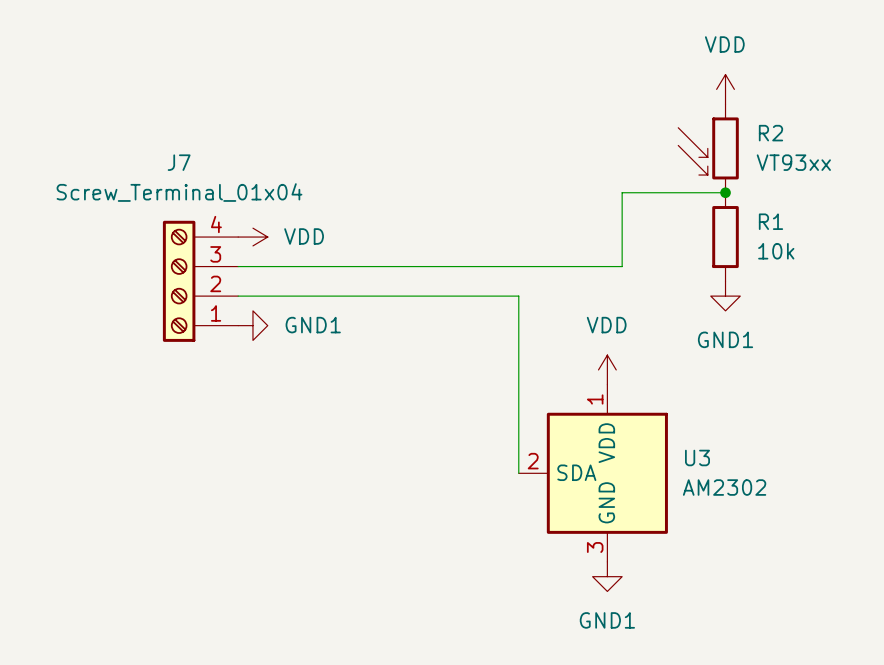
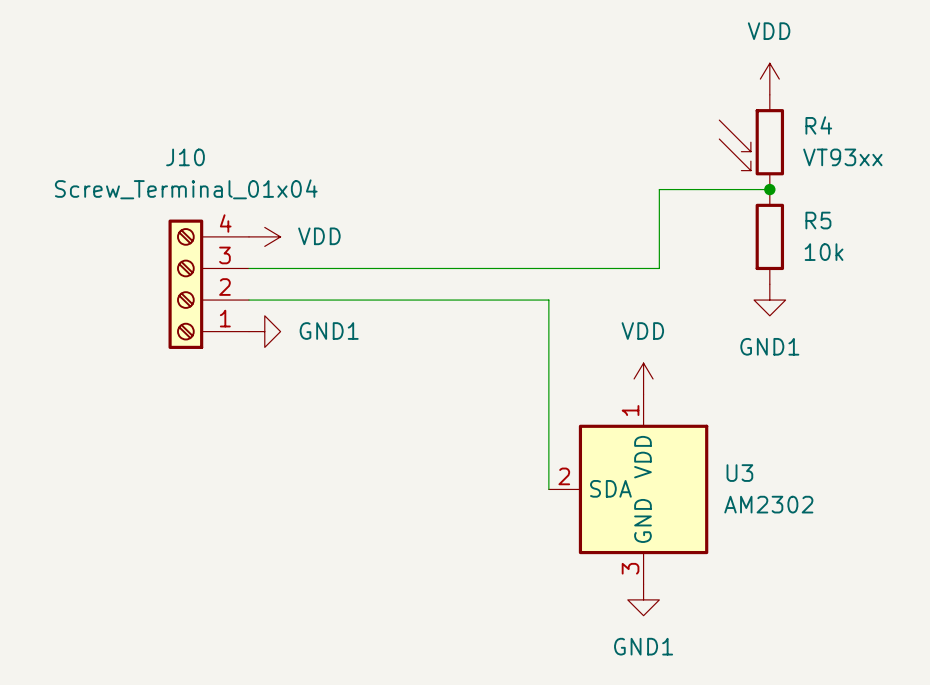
R2 name: R2 (770, 133) -> R4 (818, 125)
J7 name: J7 (179, 162) -> J10 (185, 157)
R1 name: R1 (770, 221) -> R5 (818, 220)

